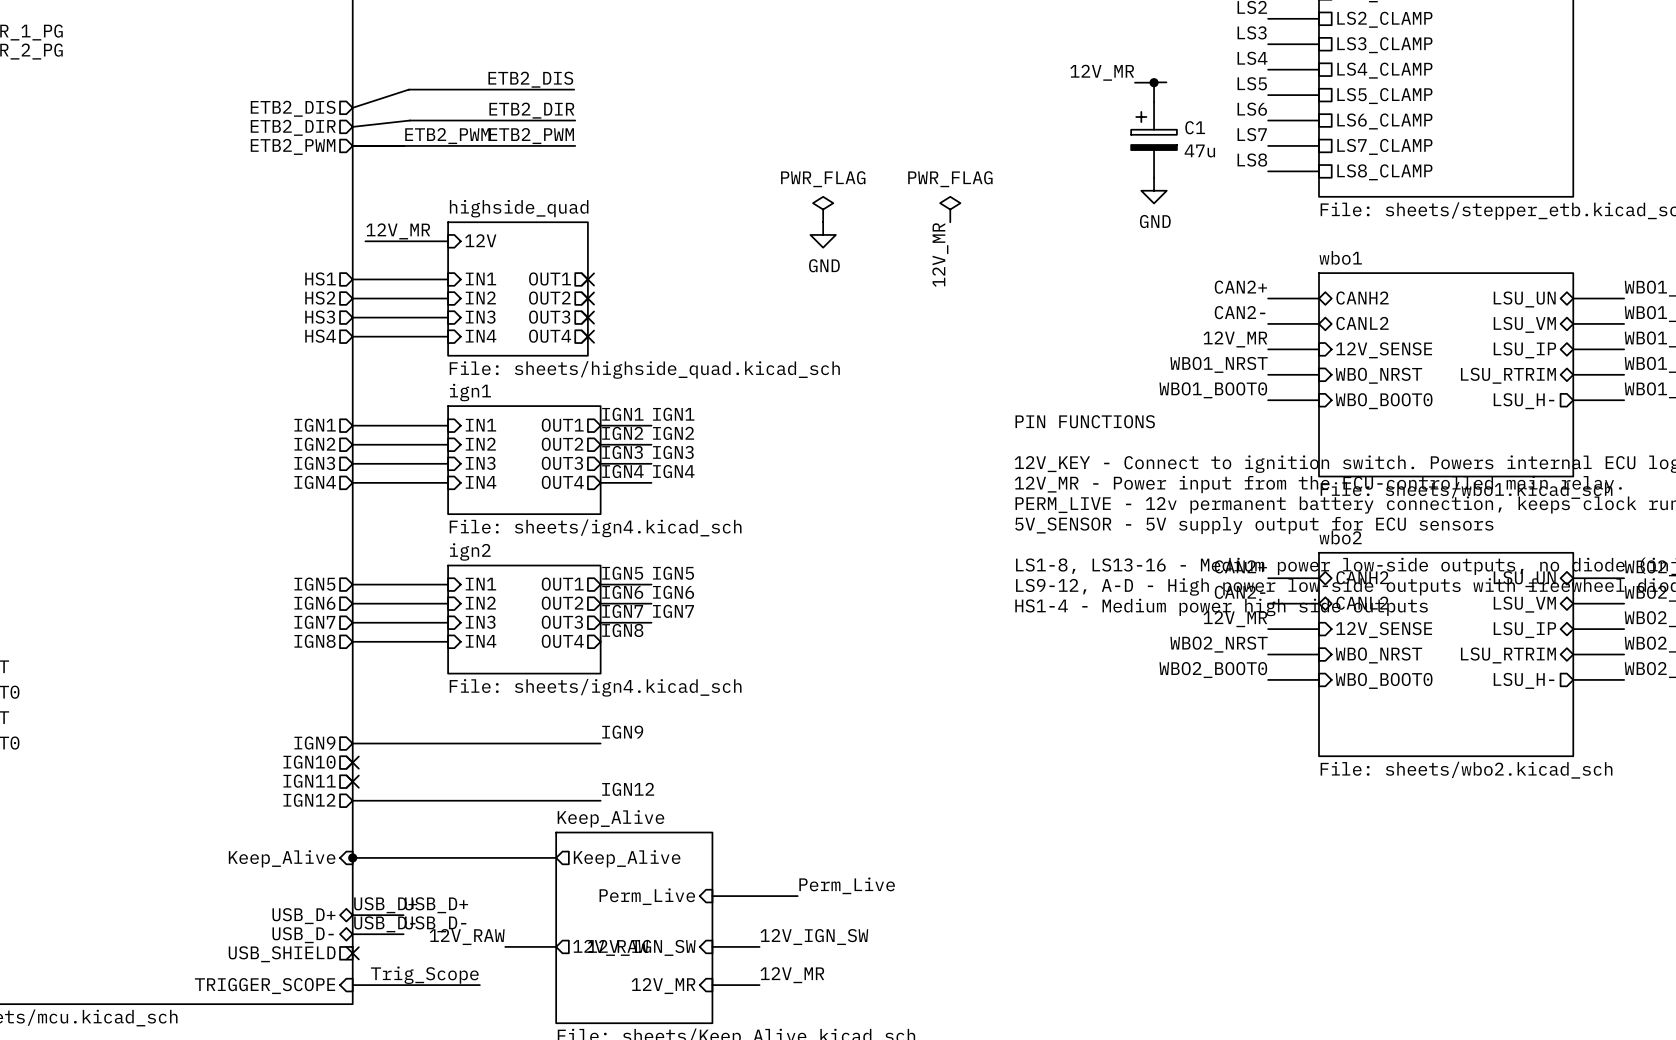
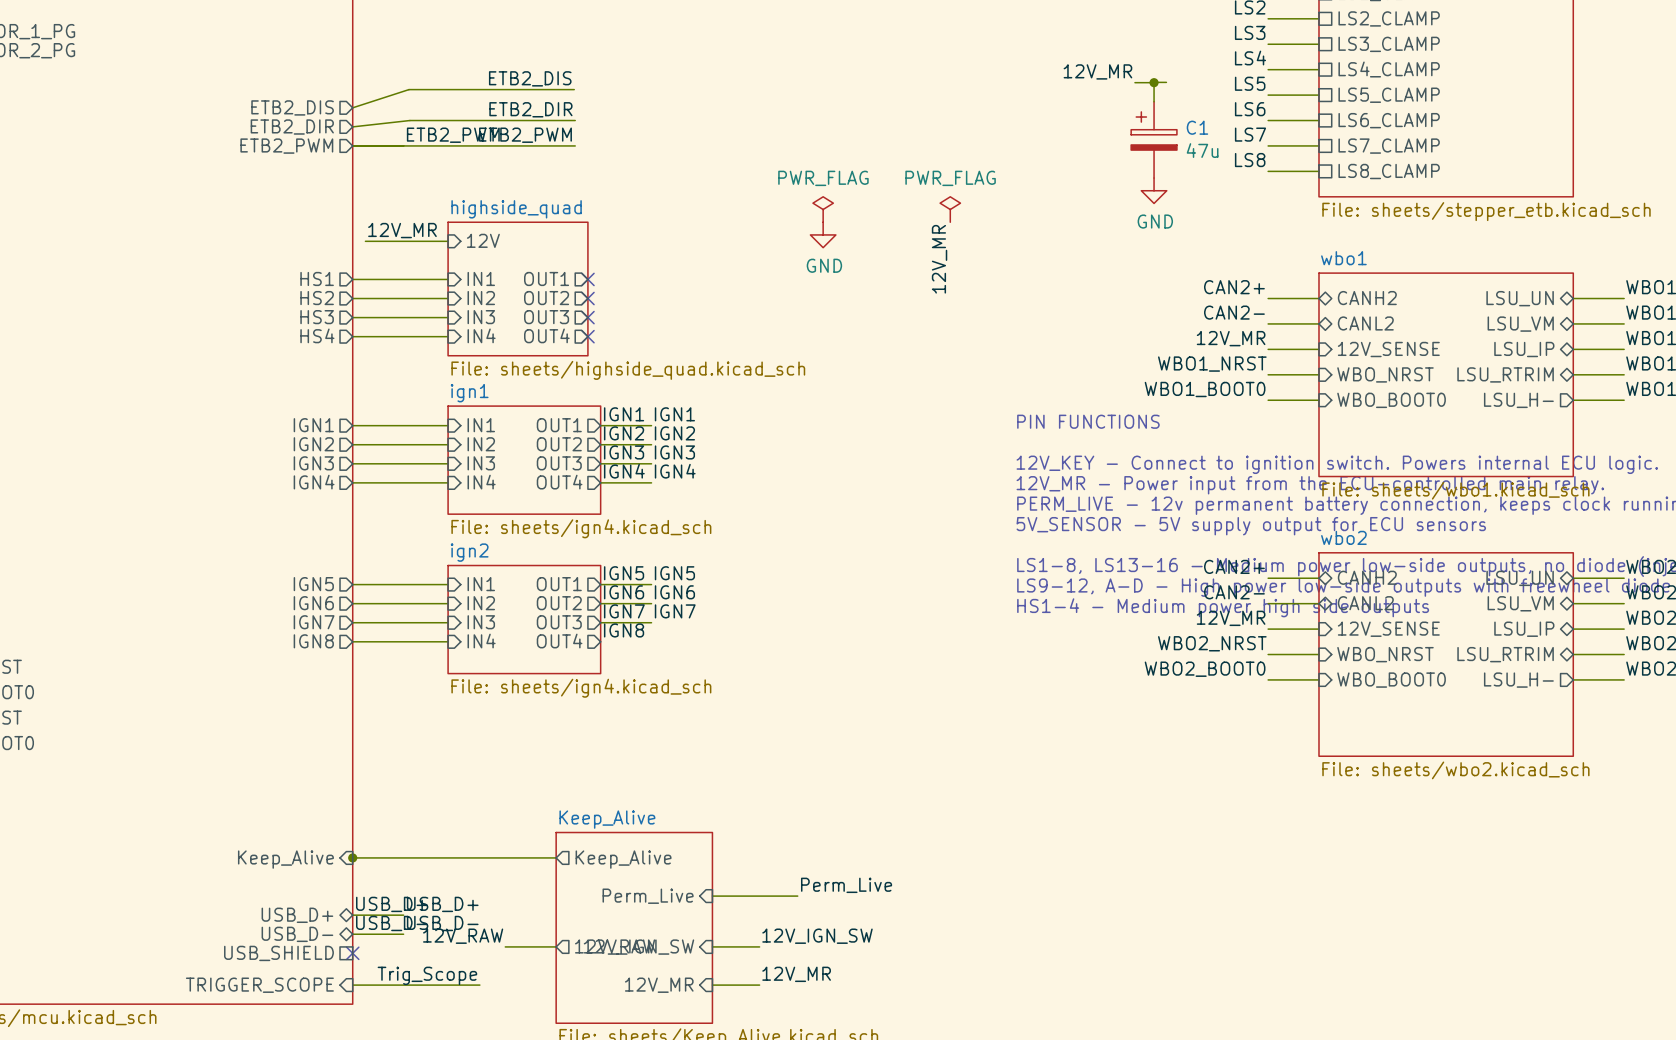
label: IGN9 (622, 732) -> none
sheet pin: IGN9 (314, 743) -> none
wire: (352, 743) (600, 743) -> none
sheet pin: IGN10 (309, 762) -> none
no-connect mark: (352, 762) -> none
sheet pin: IGN11 (309, 781) -> none
no-connect mark: (352, 781) -> none
label: IGN12 (628, 789) -> none
sheet pin: IGN12 (309, 800) -> none
wire: (352, 800) (600, 800) -> none

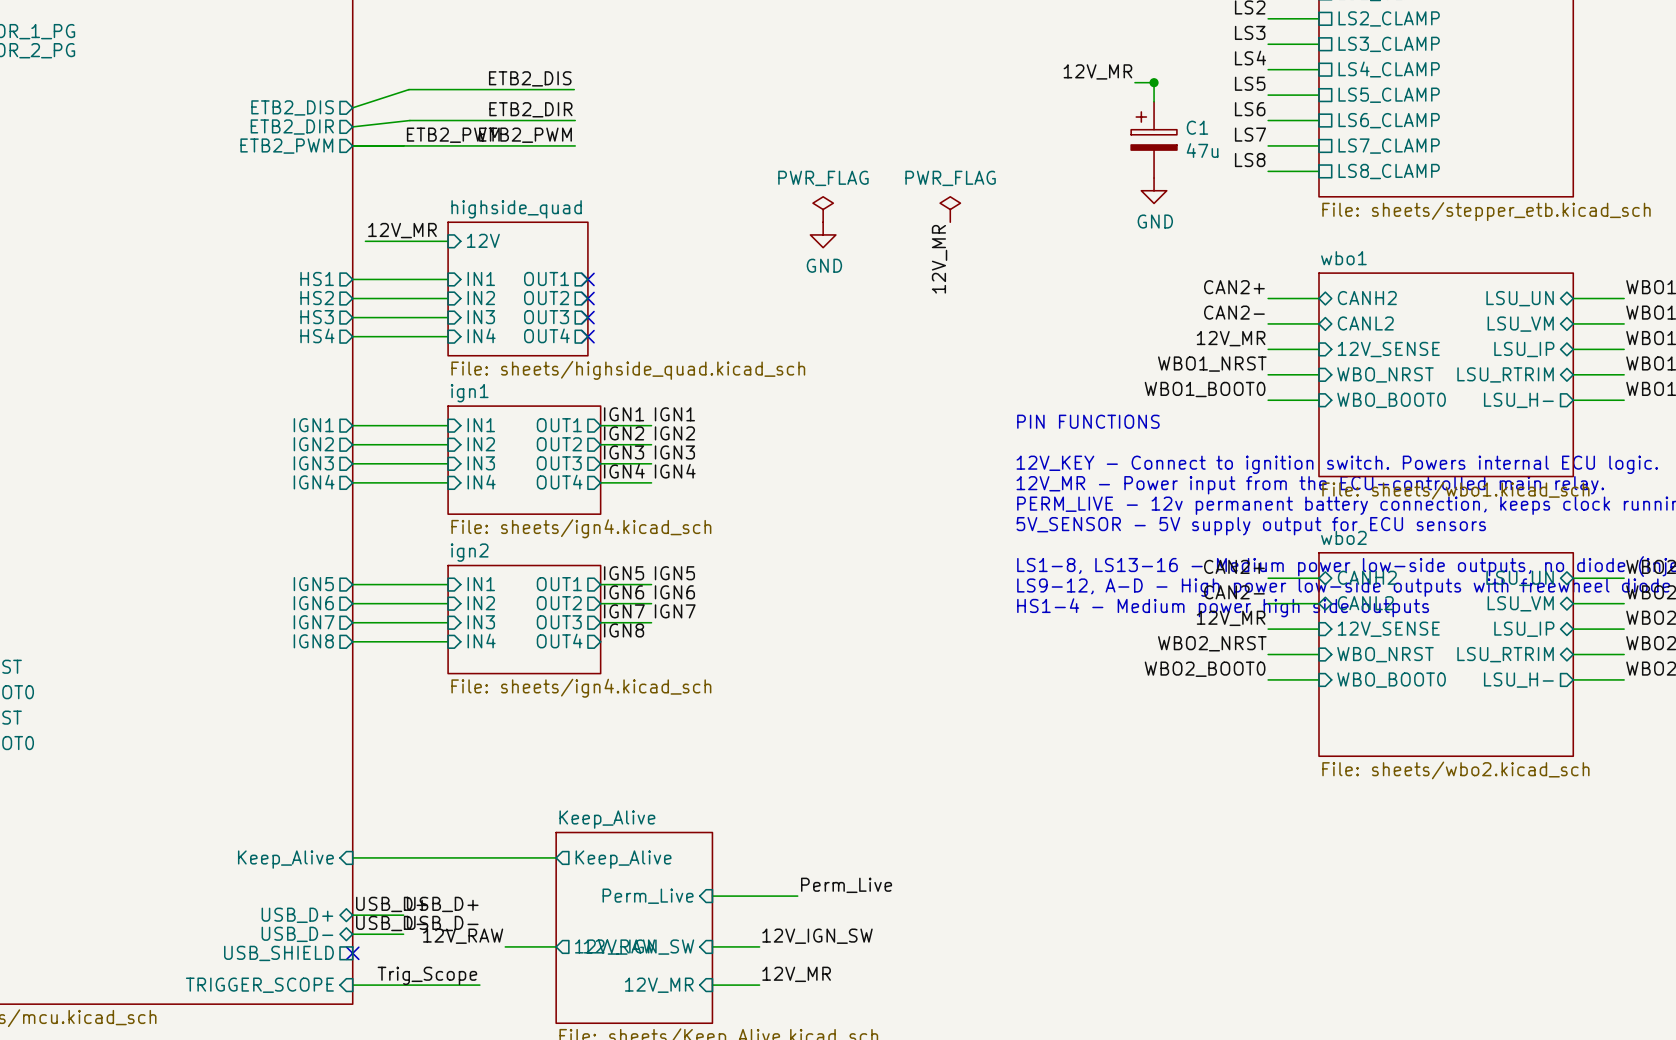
wire: (1166, 82) (1154, 82) -> none
junction: (352, 857) -> none

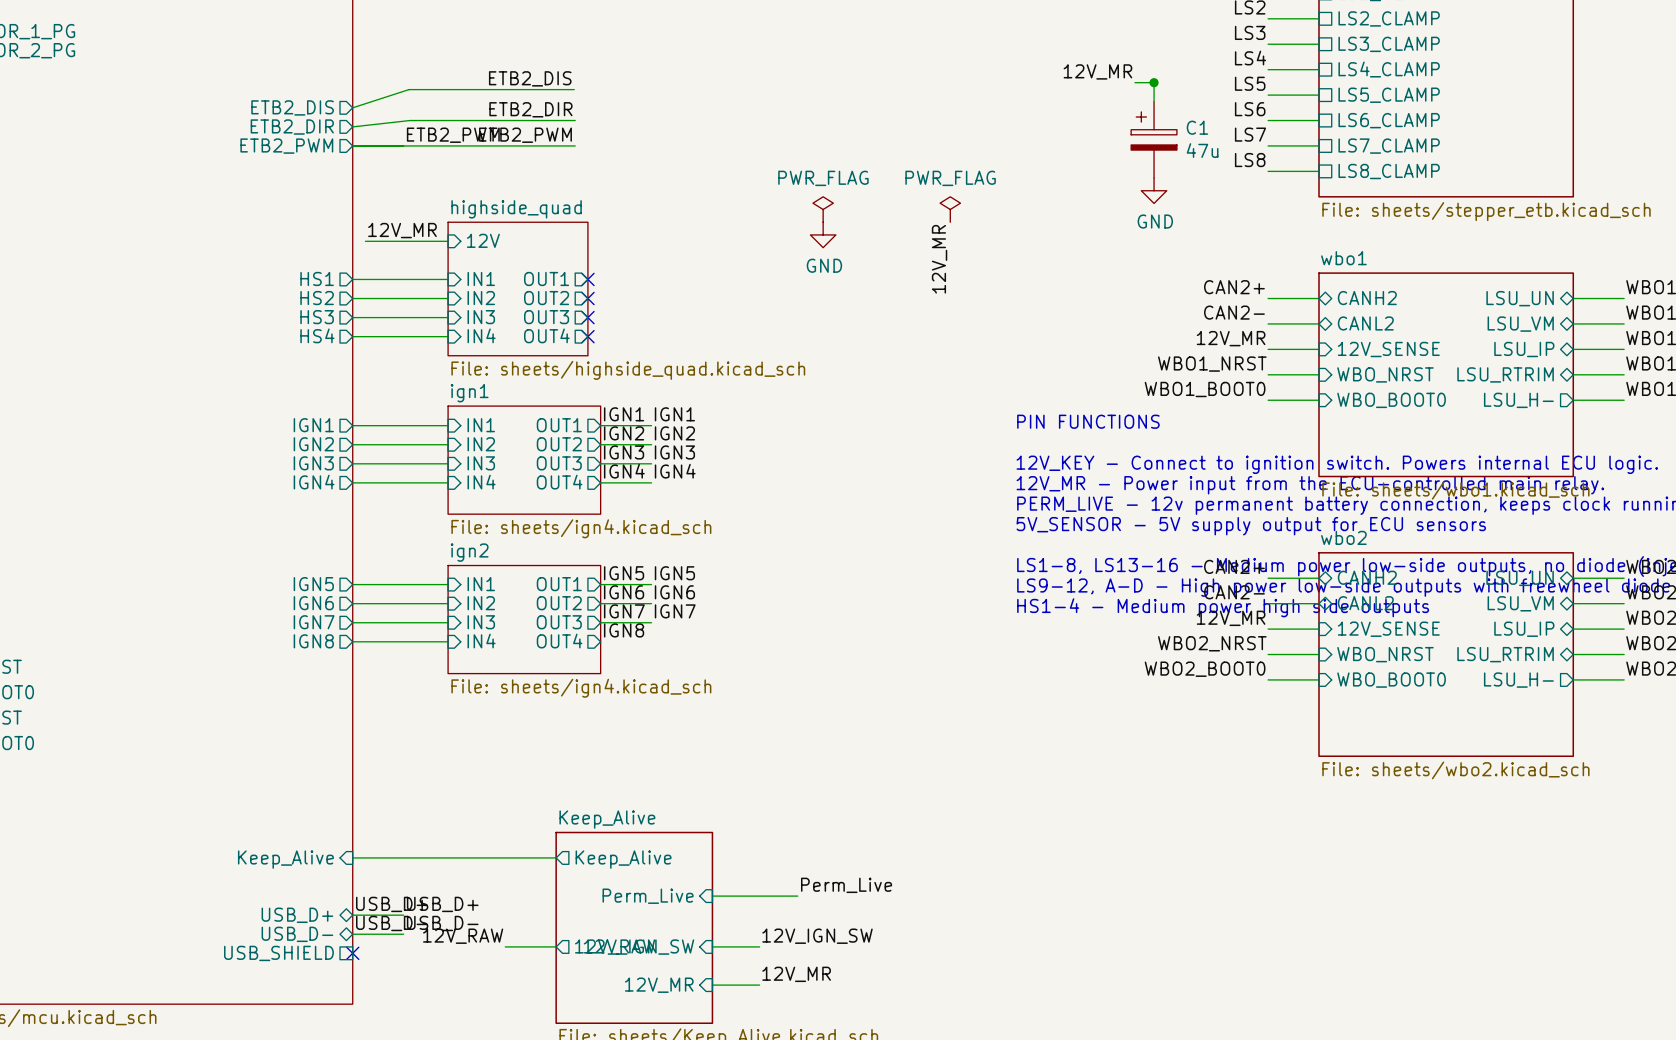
label: Trig_Scope (427, 975) -> none
sheet pin: TRIGGER_SCOPE (259, 985) -> none
wire: (352, 985) (479, 985) -> none

